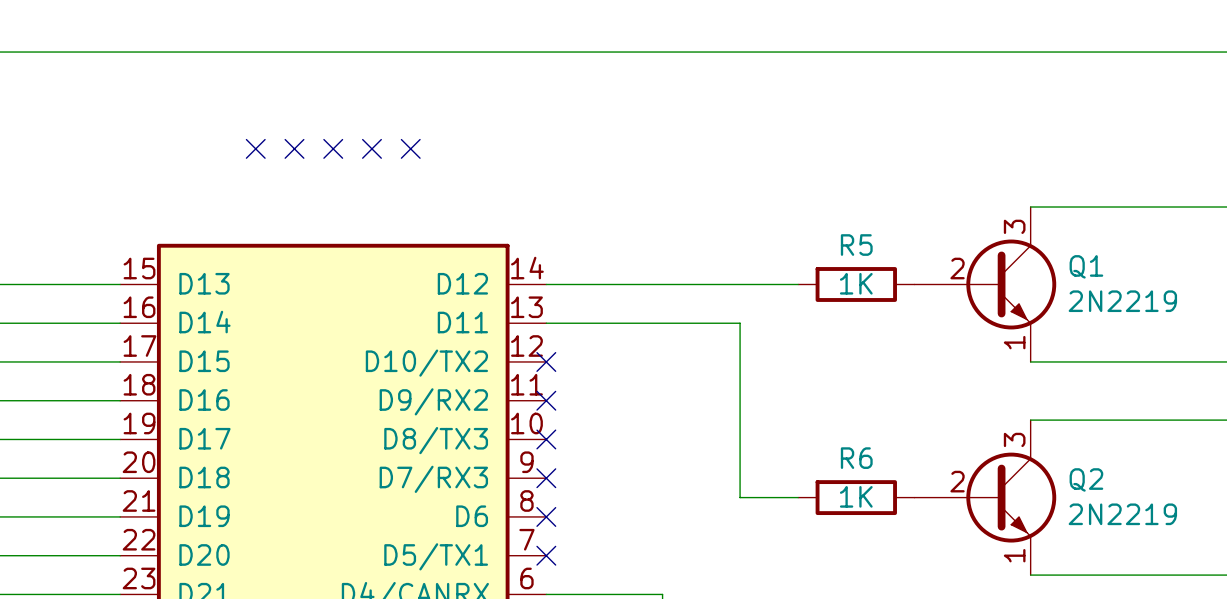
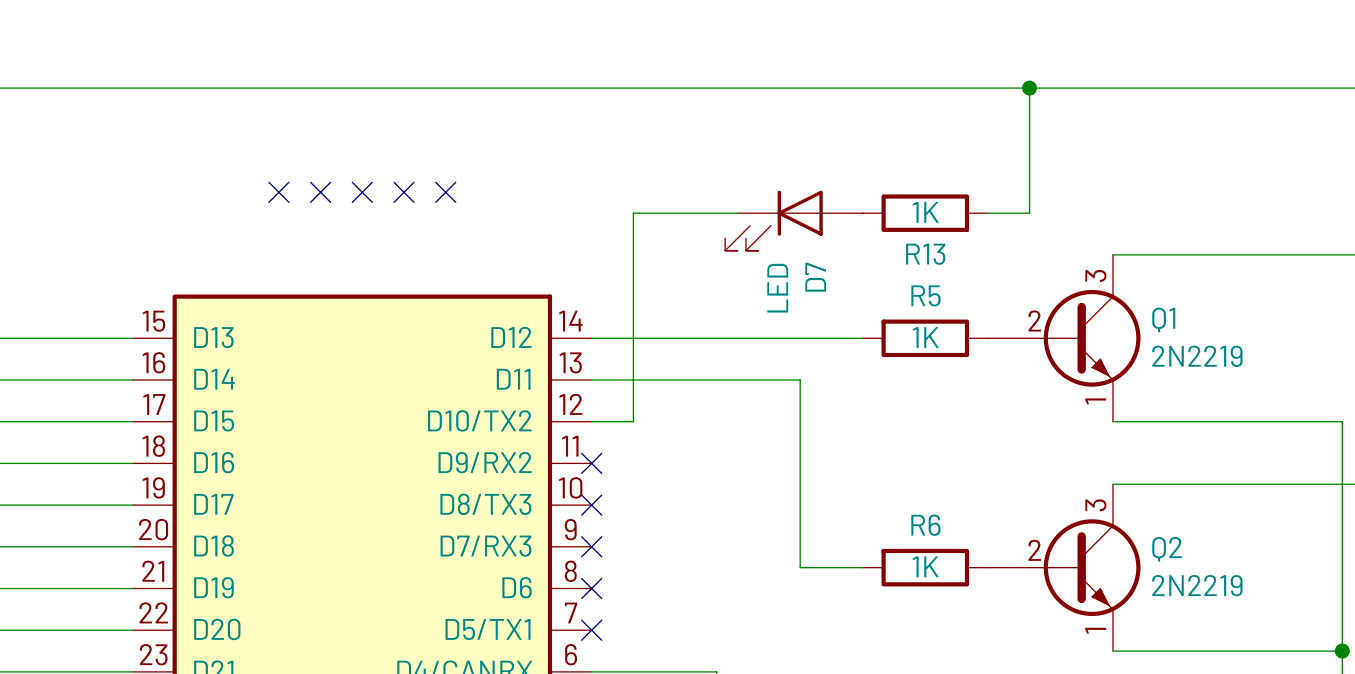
wire: none -> (1029, 88) (1029, 213) (987, 213)
junction: none -> (1029, 88)
wire: none -> (737, 213) (633, 213) (633, 421) (591, 421)
R13: none -> 1K (925, 213)
D7: none -> LED (793, 220)
no-connect mark: (546, 361) -> none

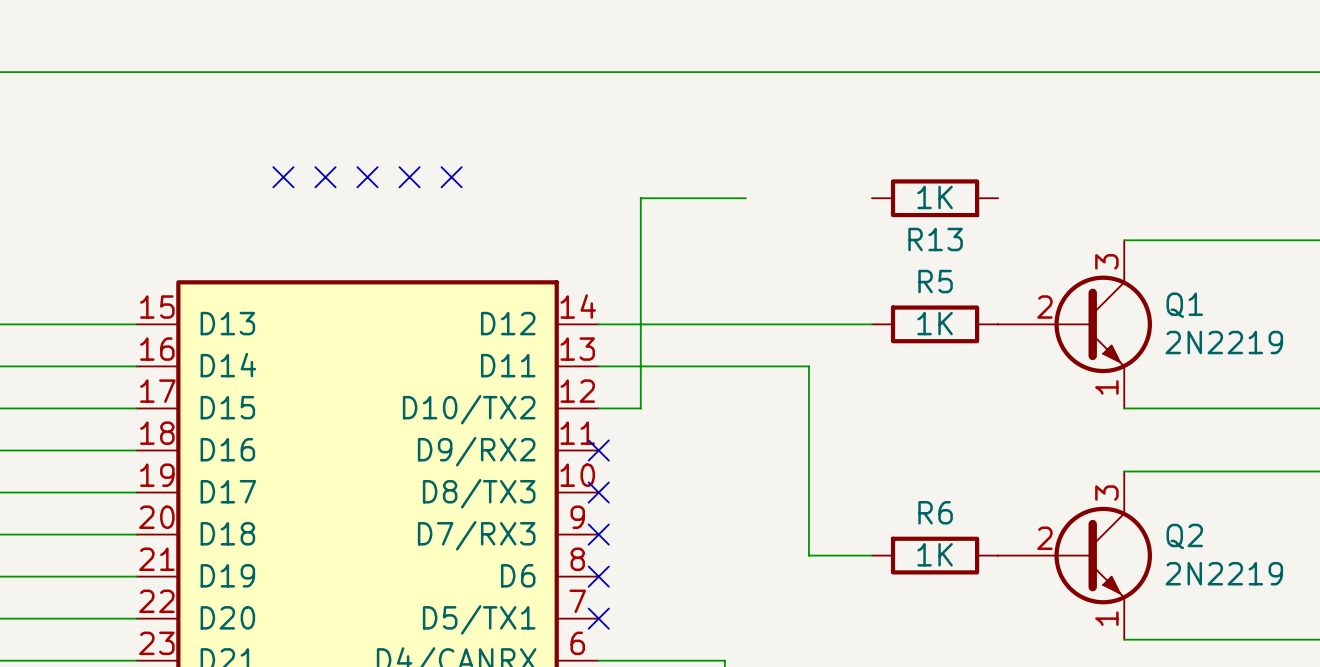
wire: (1029, 88) (1029, 213) (987, 213) -> none
junction: (1029, 88) -> none
D7: LED (793, 220) -> none

